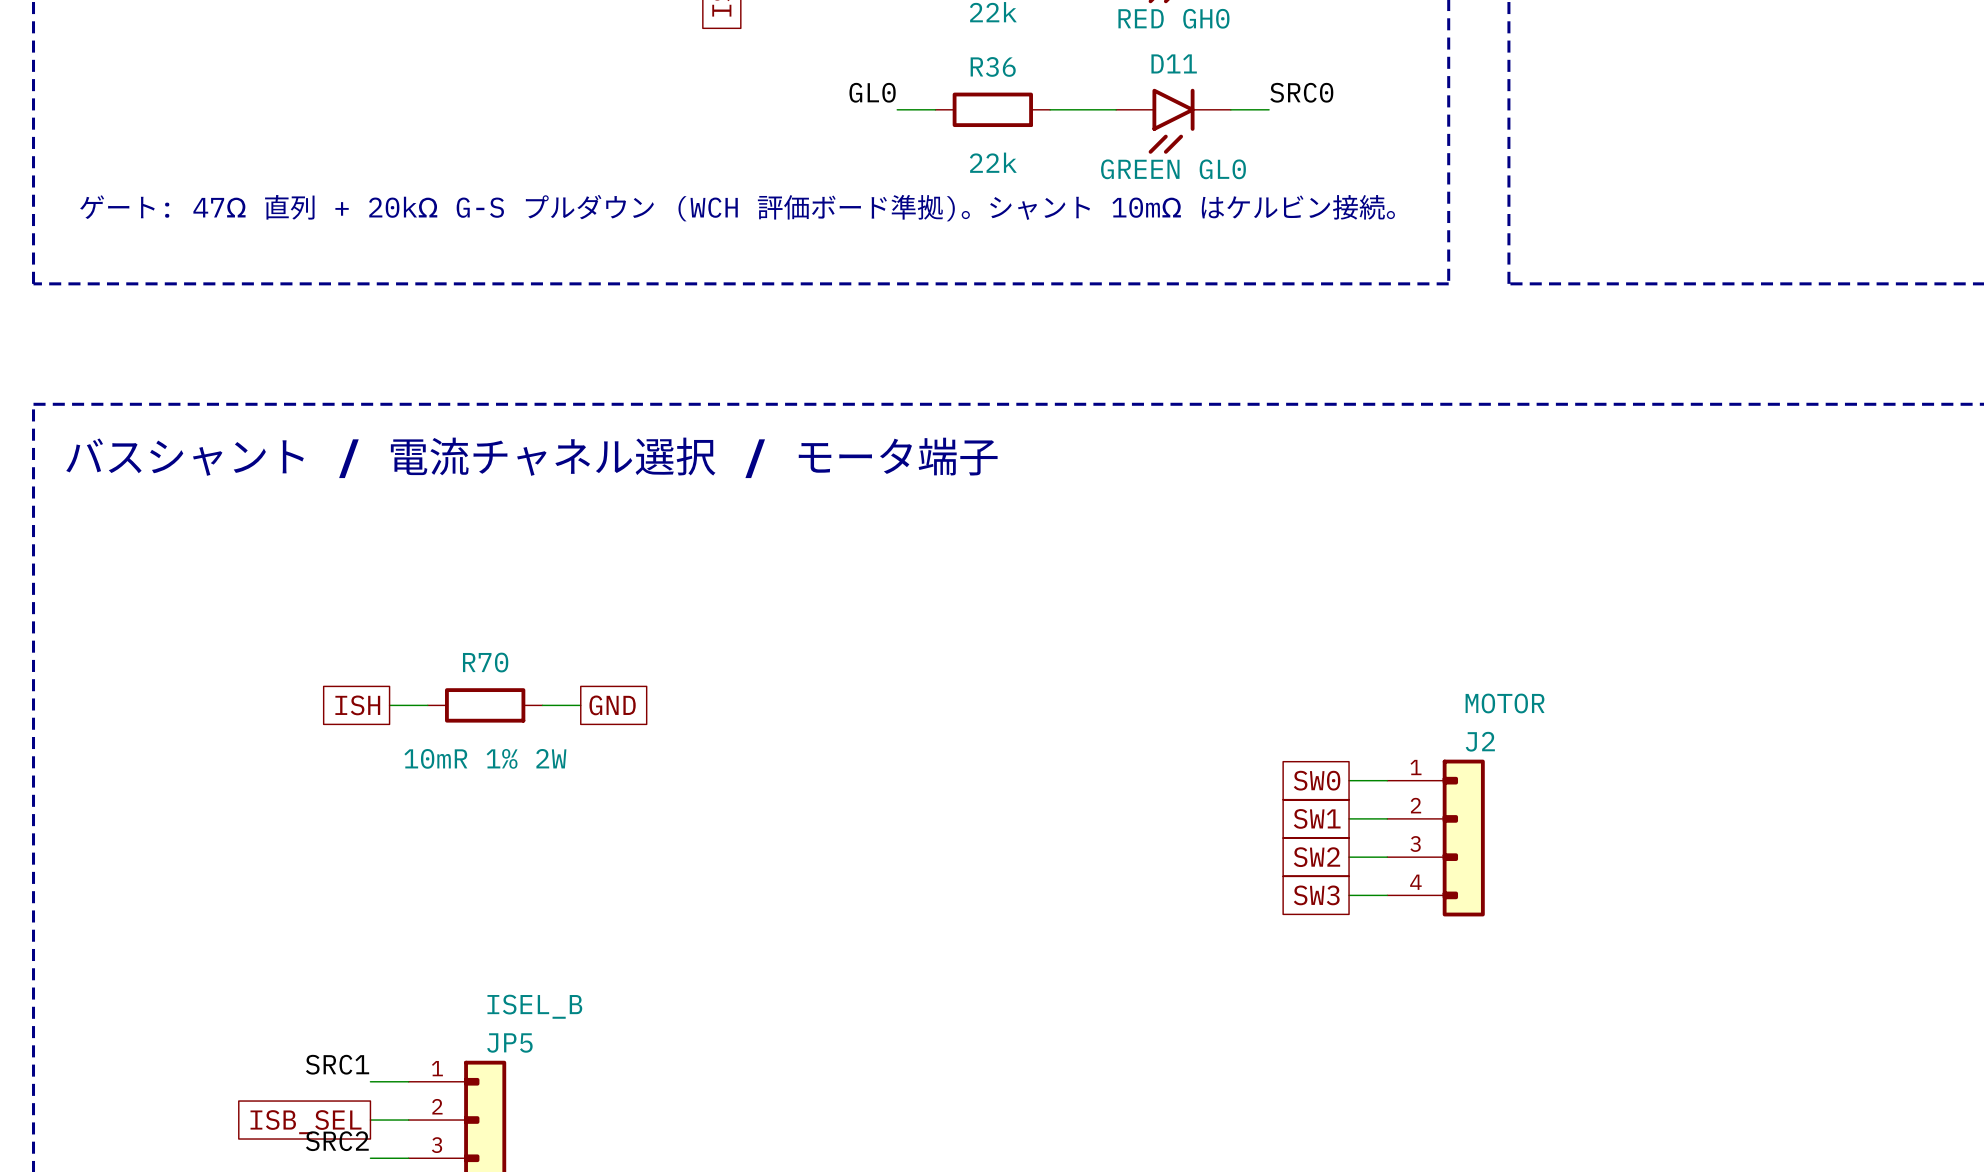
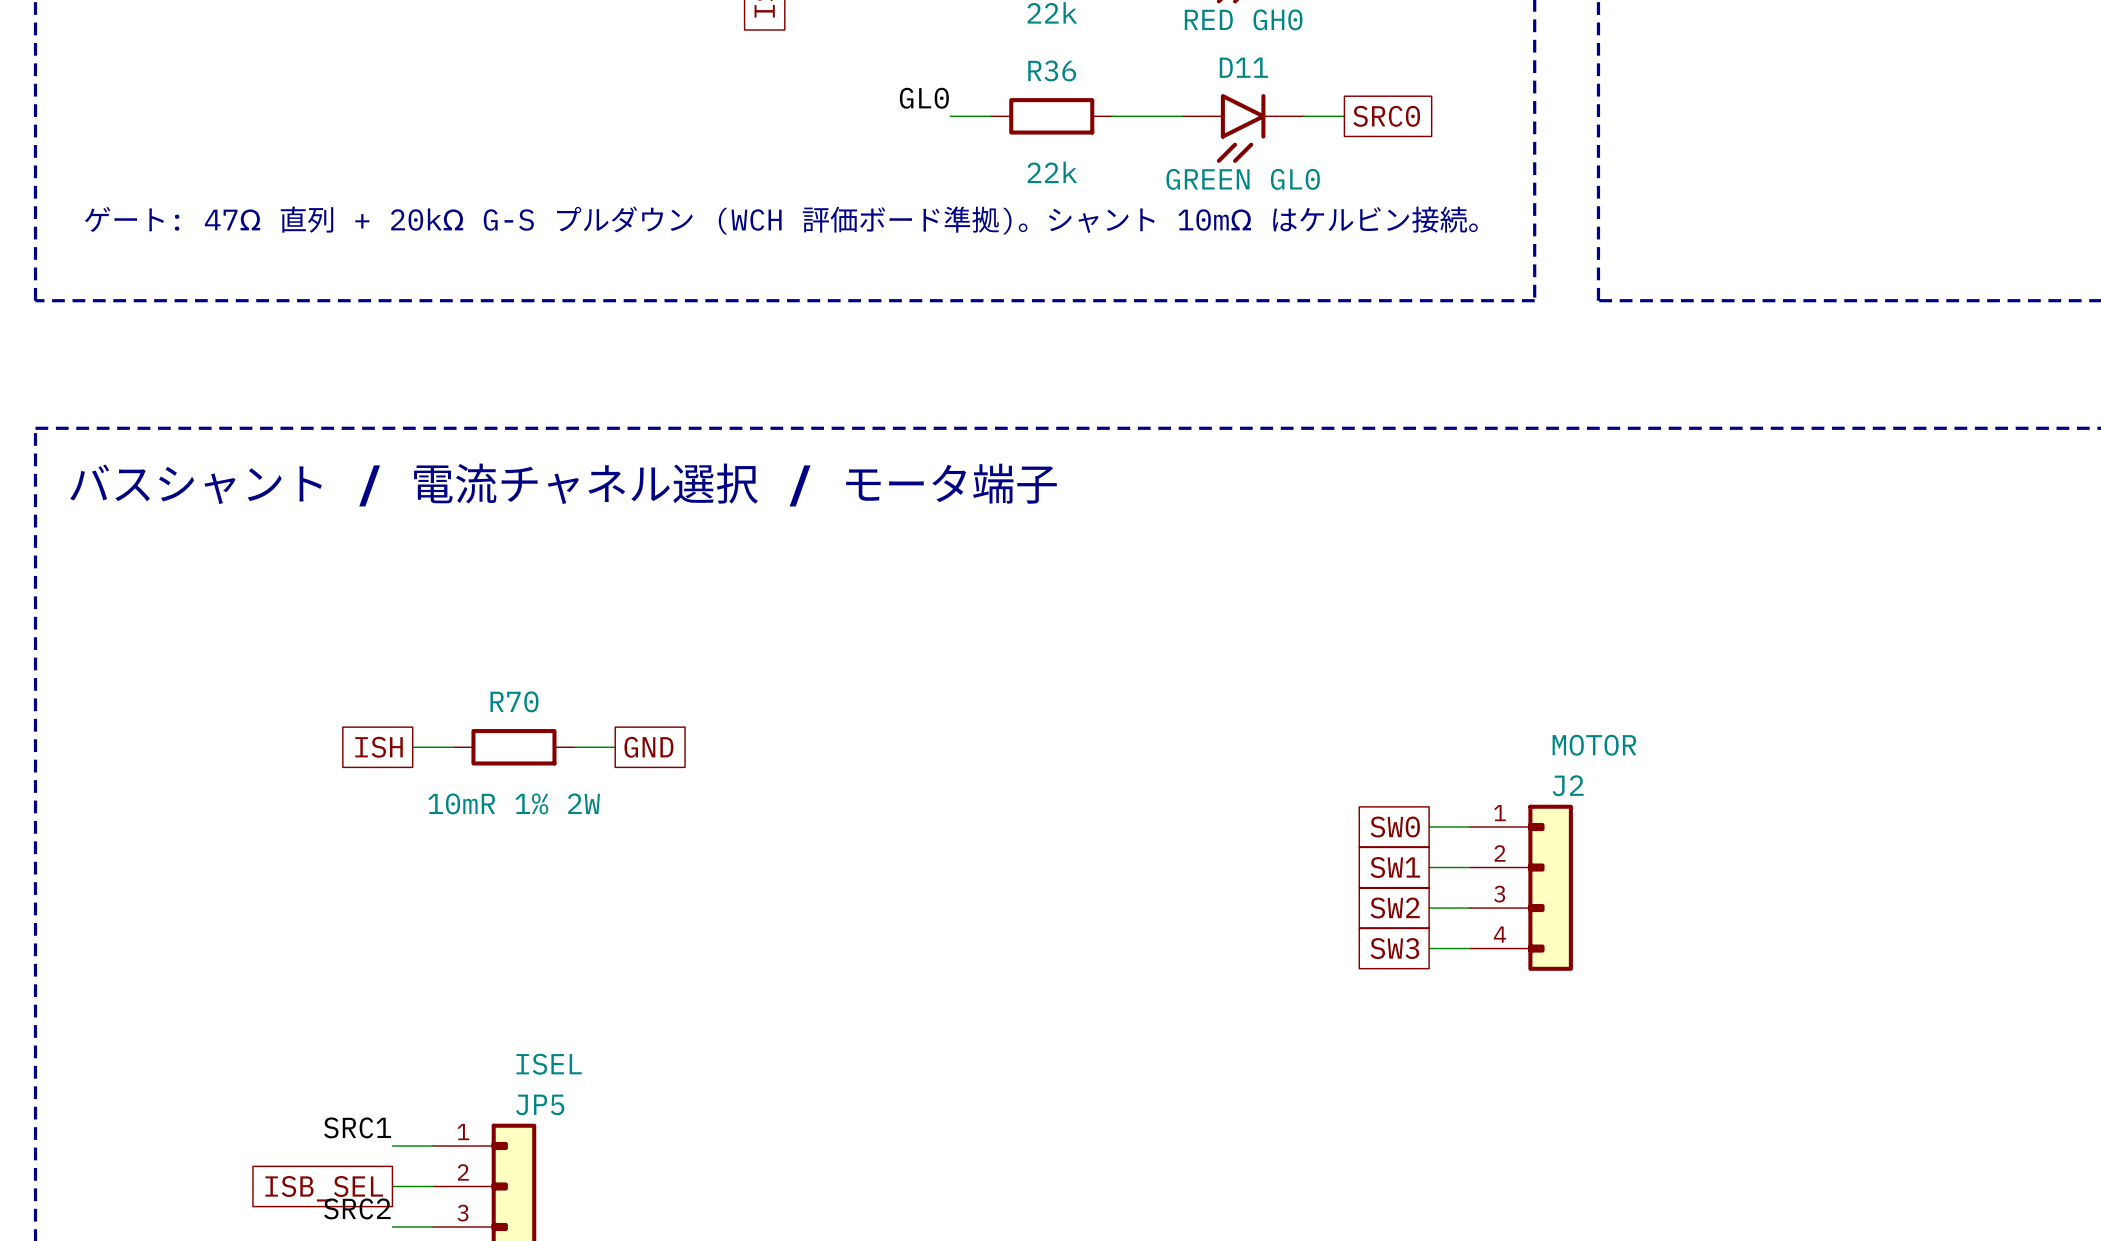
label: SRC0 (1301, 92) -> none
global label: none -> SRC0 (1386, 116)
JP5 value: ISEL_B (534, 1006) -> ISEL (549, 1064)

